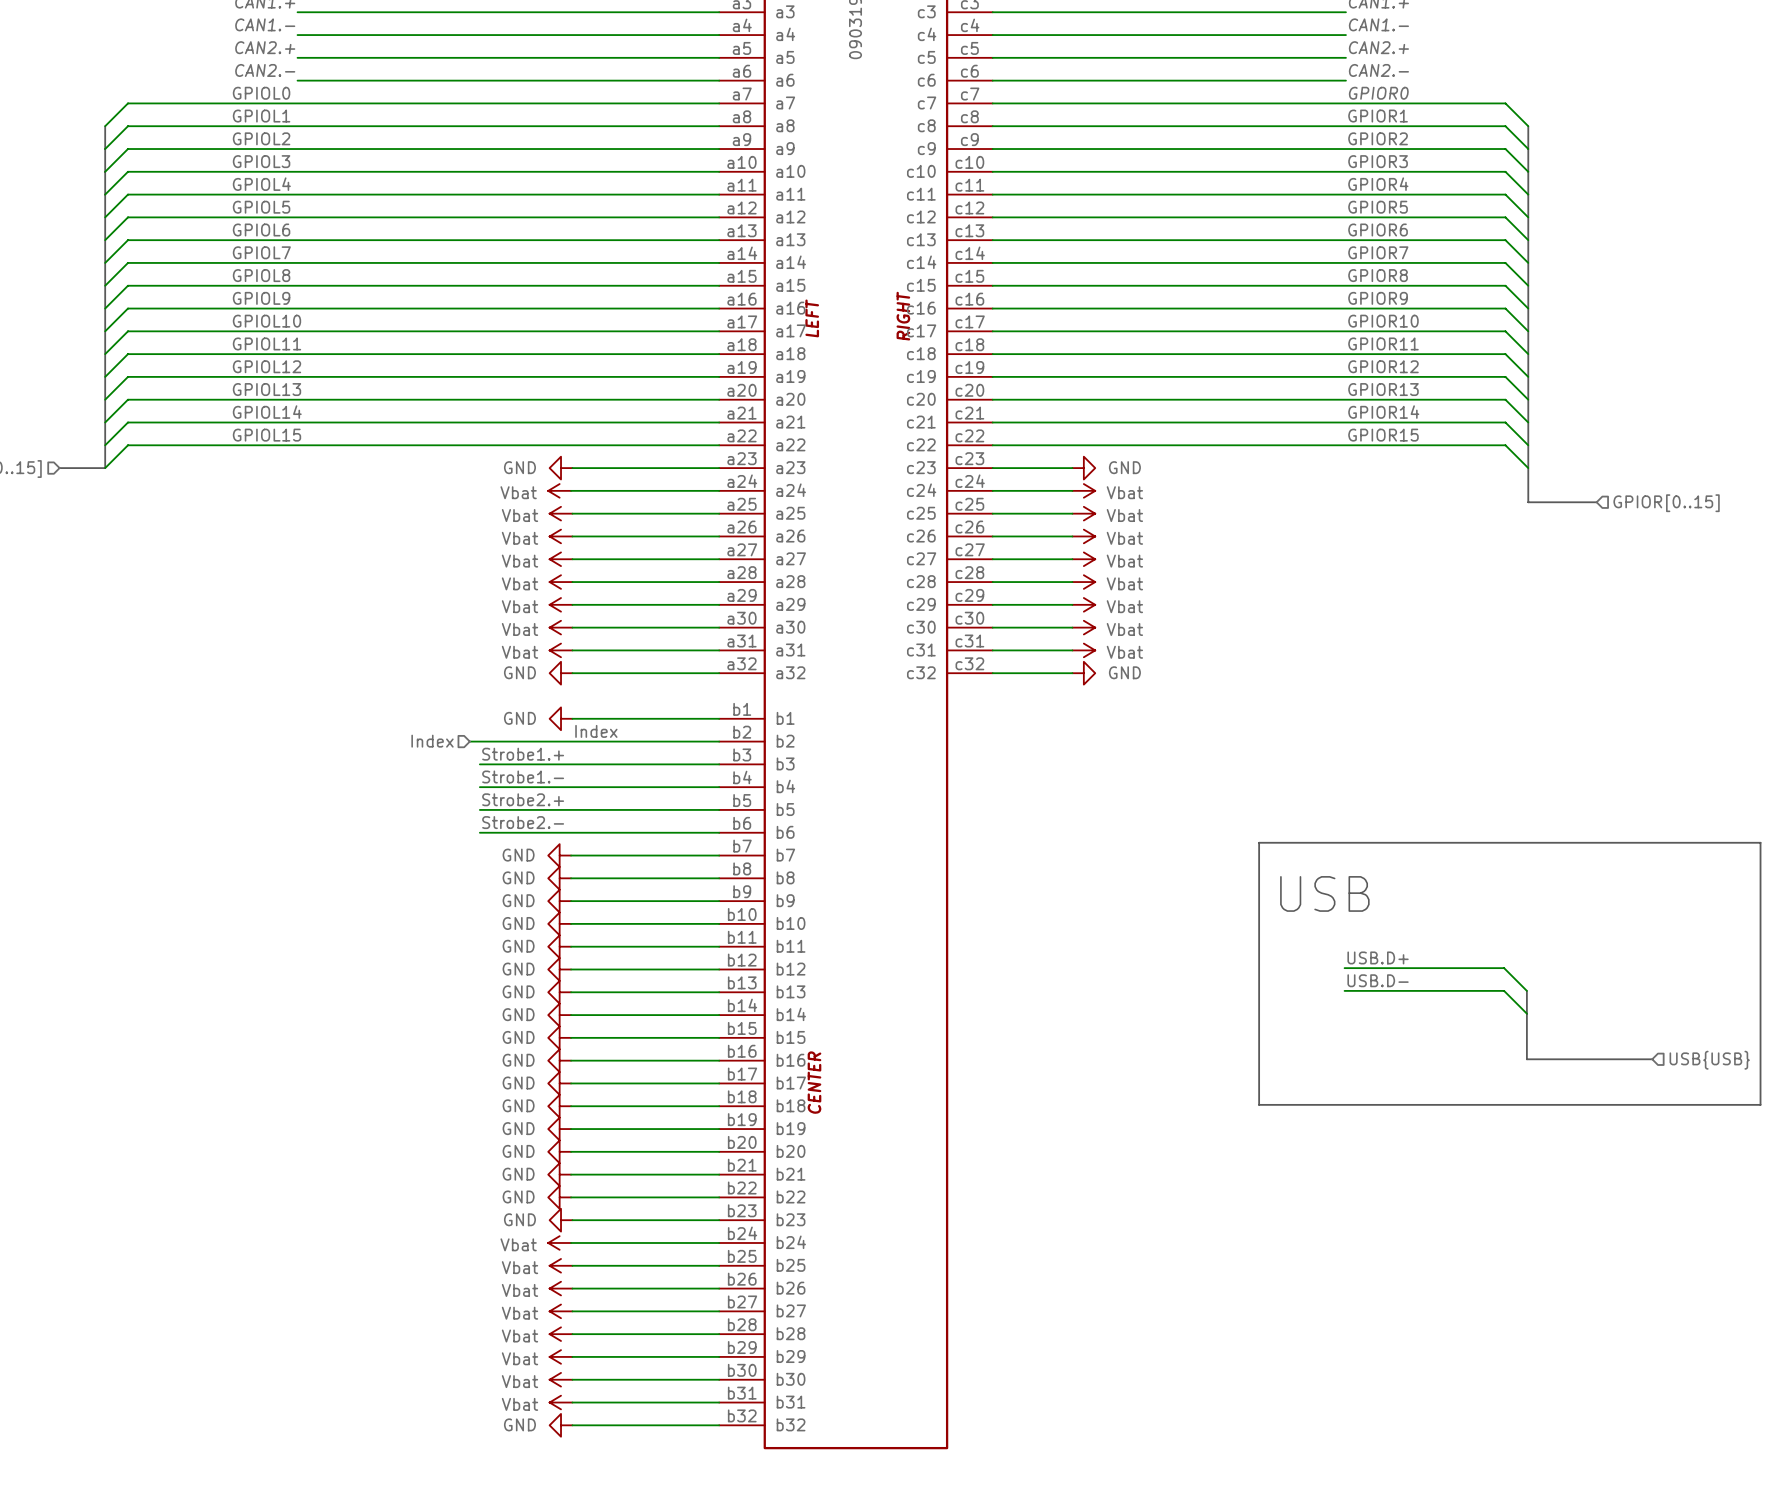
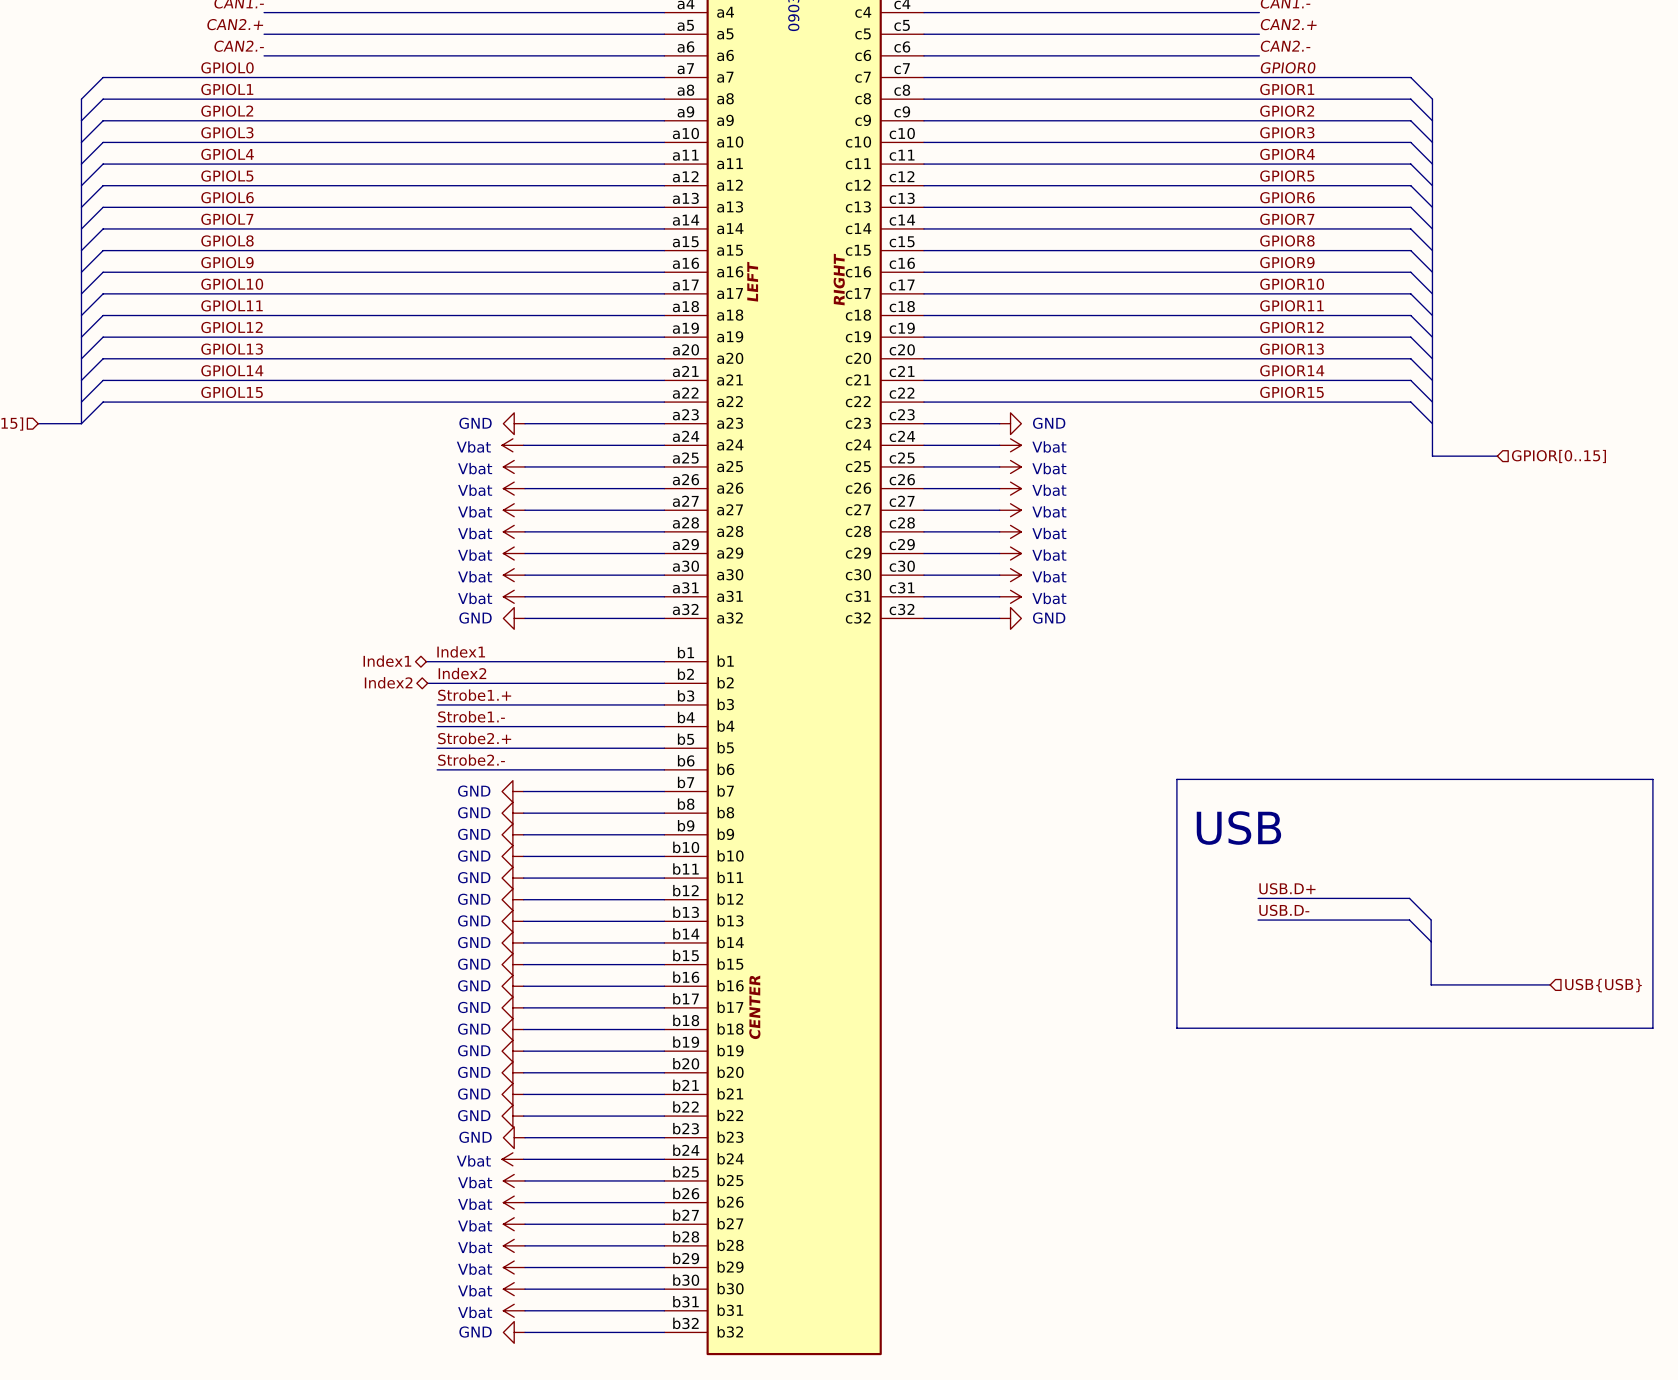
label: none -> Index1 (461, 651)
hierarchical label: none -> Index1 (387, 661)
wire: none -> (426, 661) (525, 661)
power symbol: GND (561, 718) -> none
label: none -> Index2 (462, 673)
label: Index (596, 731) -> none
hierarchical label shape: input (432, 741) -> bidirectional (388, 682)
hierarchical label: Index (432, 741) -> Index2 (388, 682)

